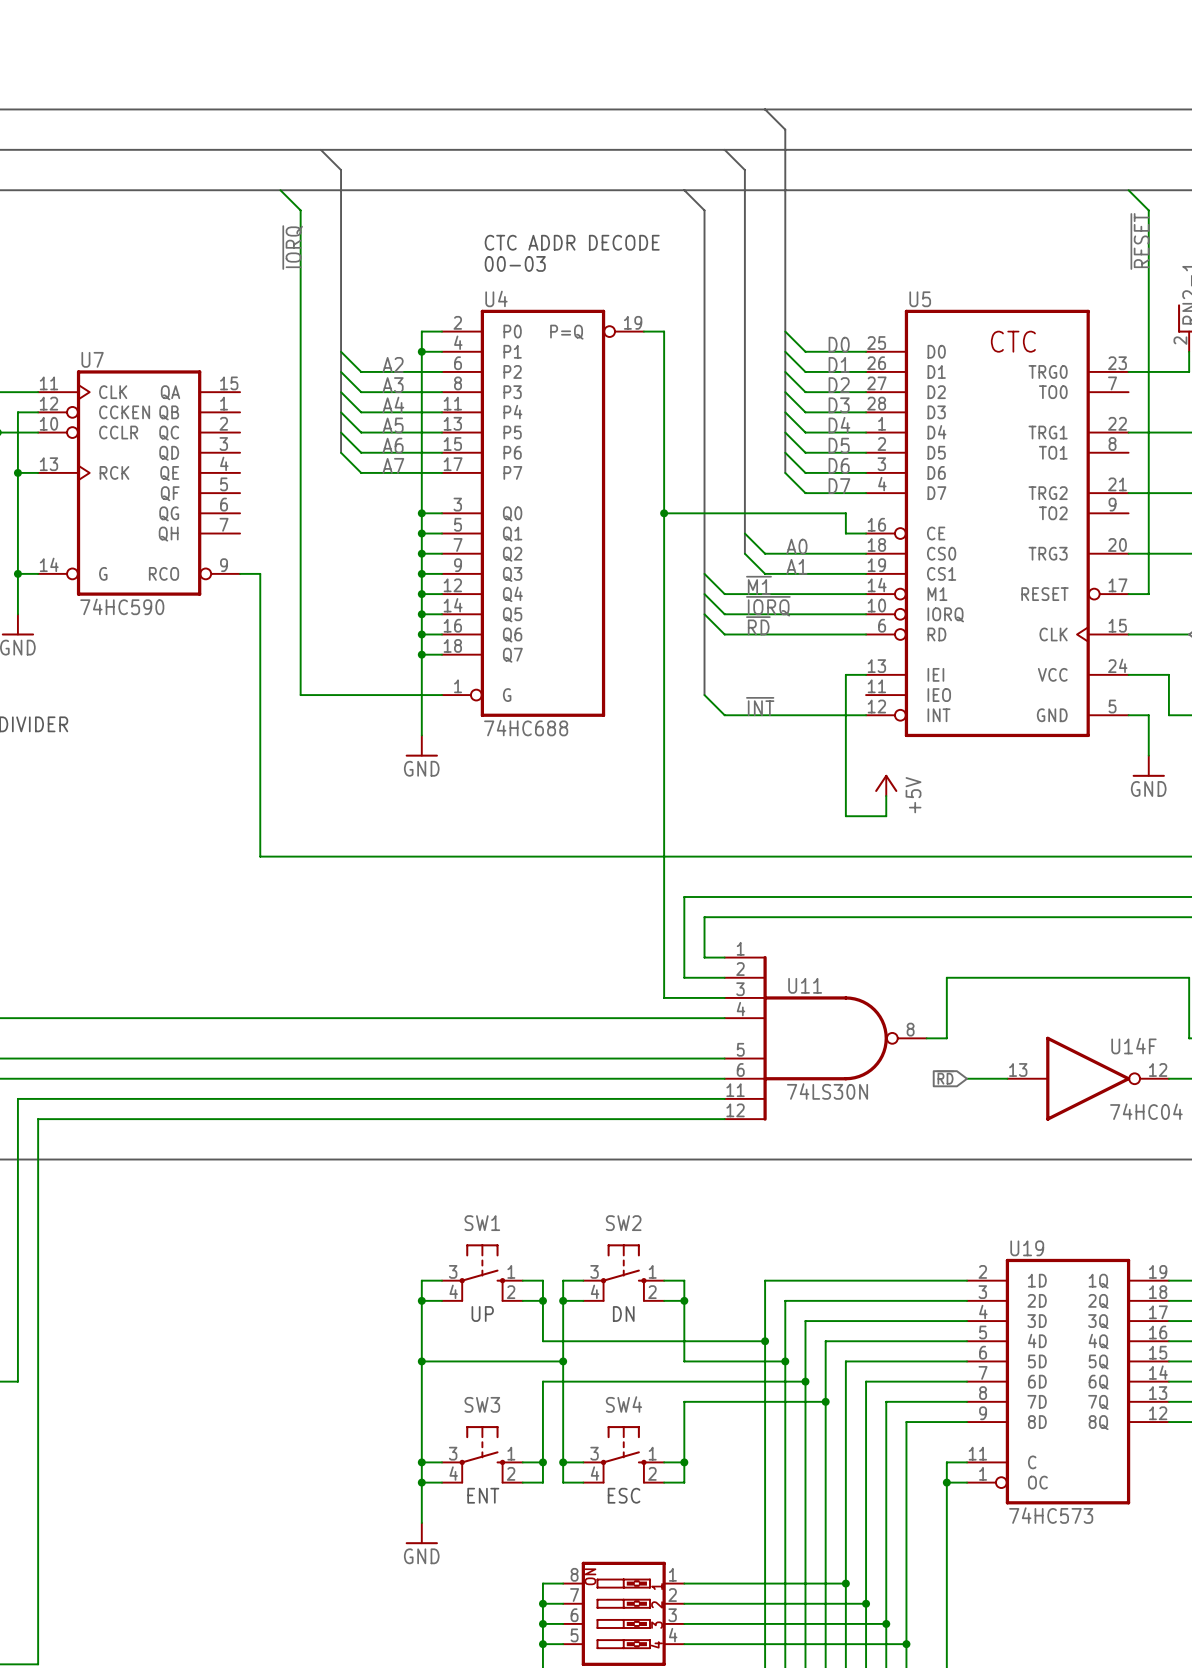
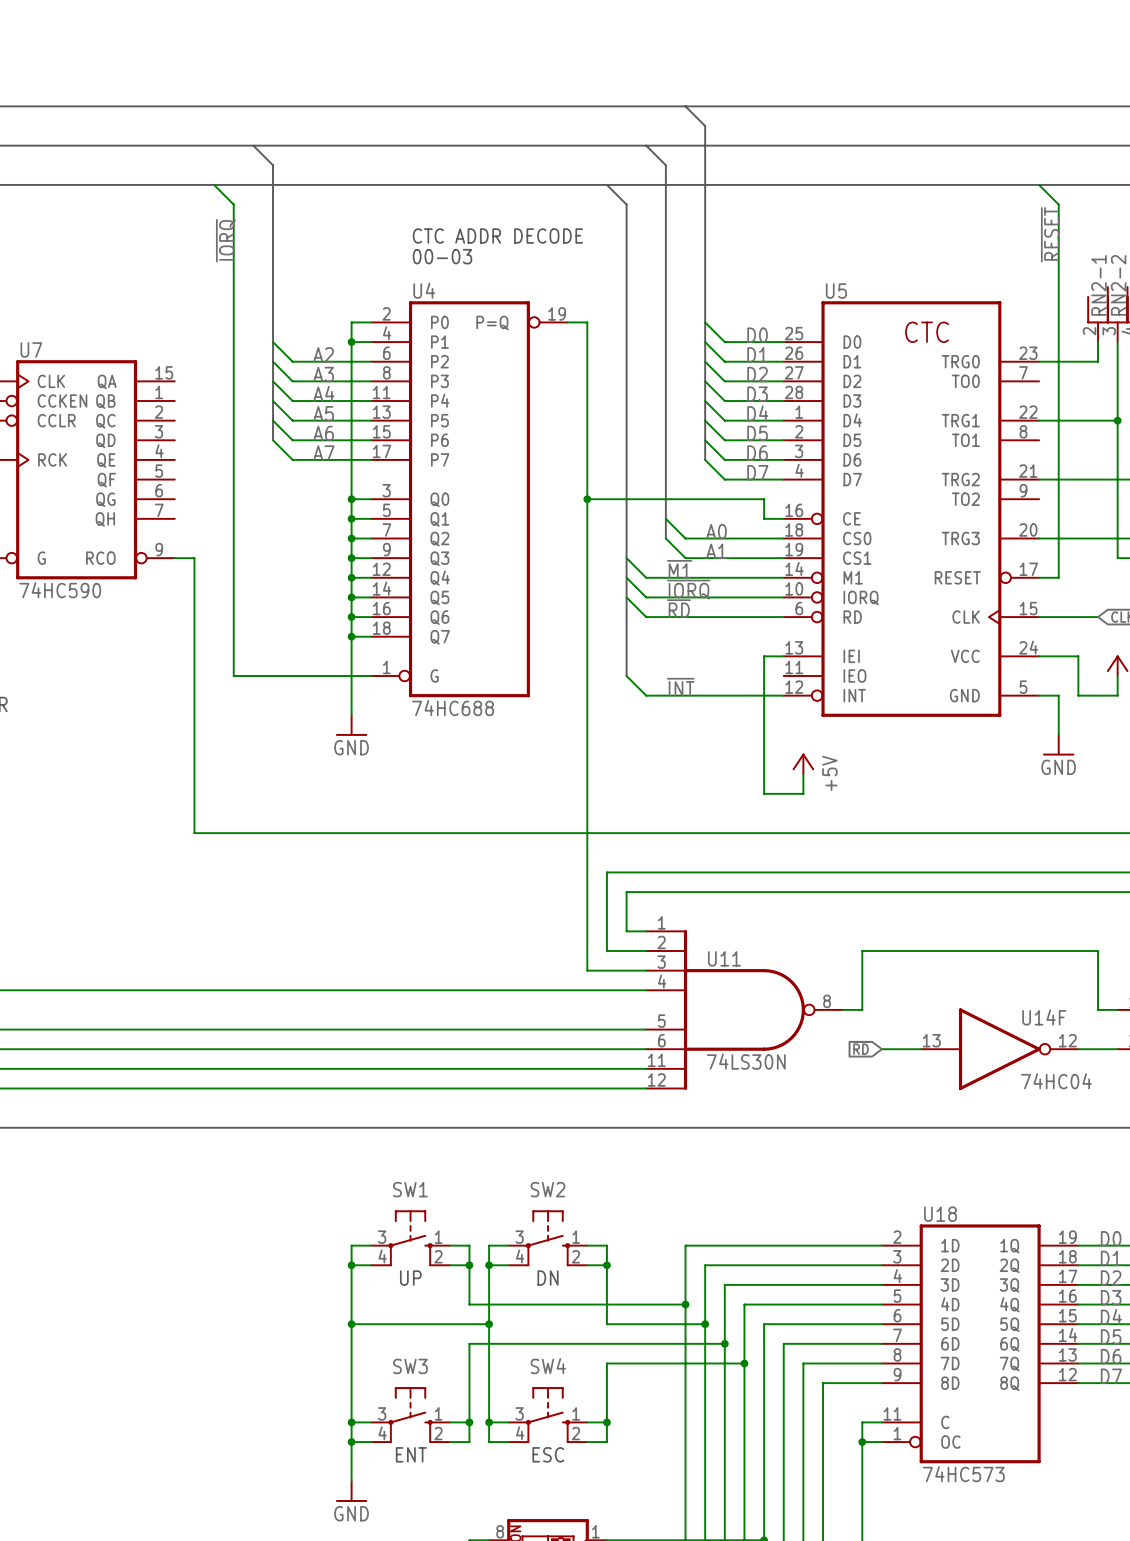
U19 name: U19 (1027, 1248) -> U18 (940, 1214)

